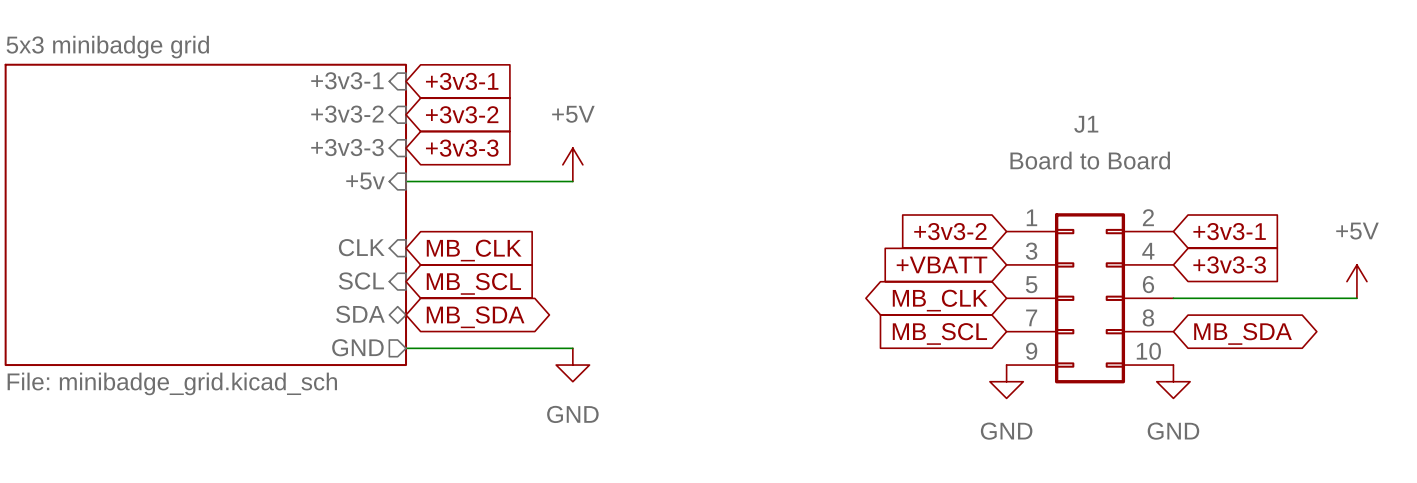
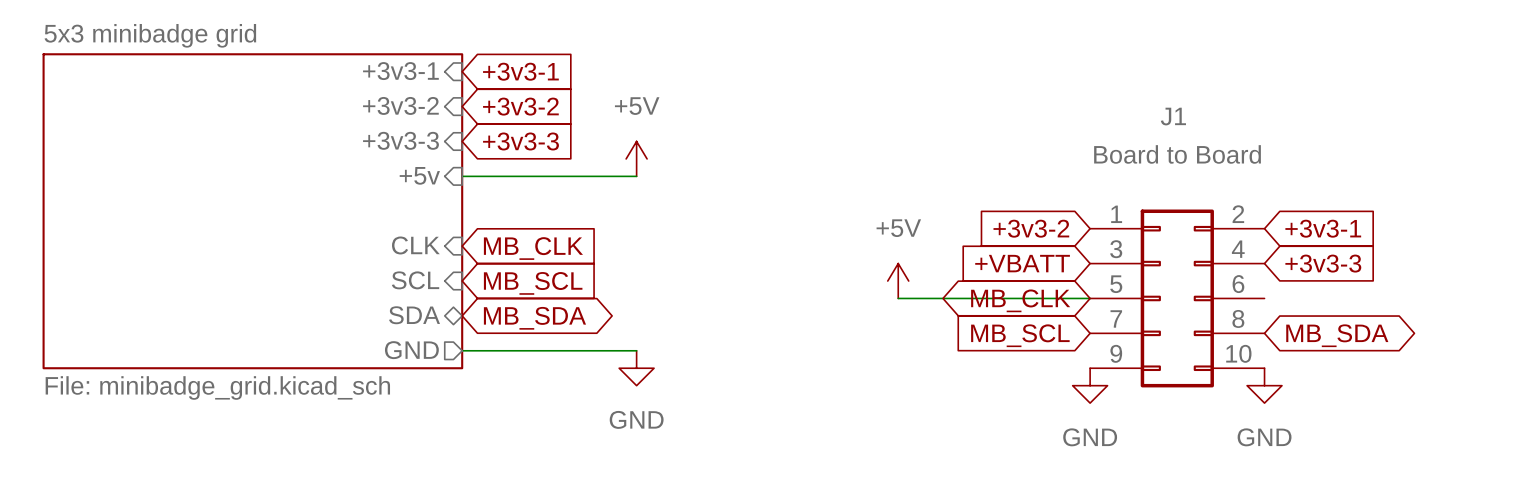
power symbol: none -> +5V (898, 281)
power symbol: +5V (1356, 281) -> none
wire: none -> (898, 298) (1090, 298)
wire: (1173, 298) (1356, 298) -> none

